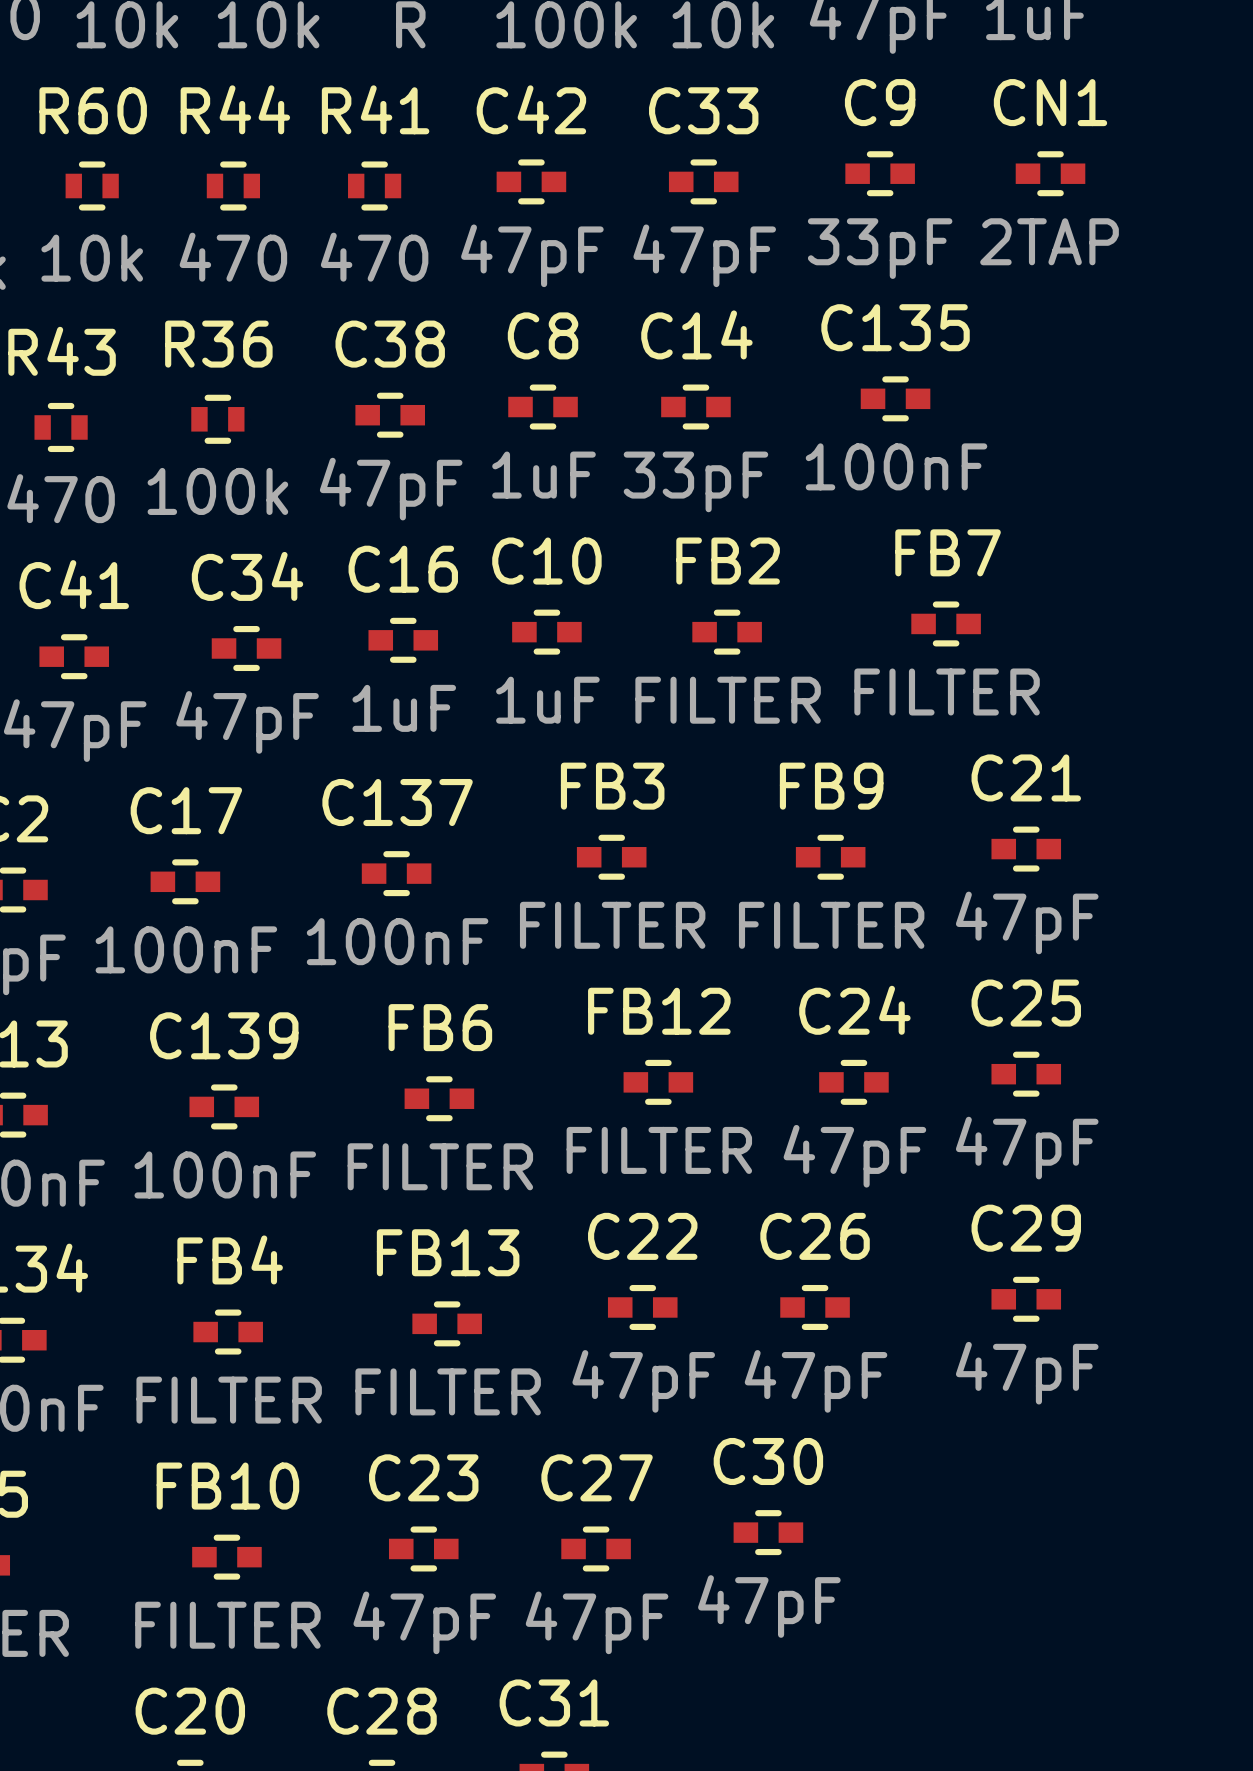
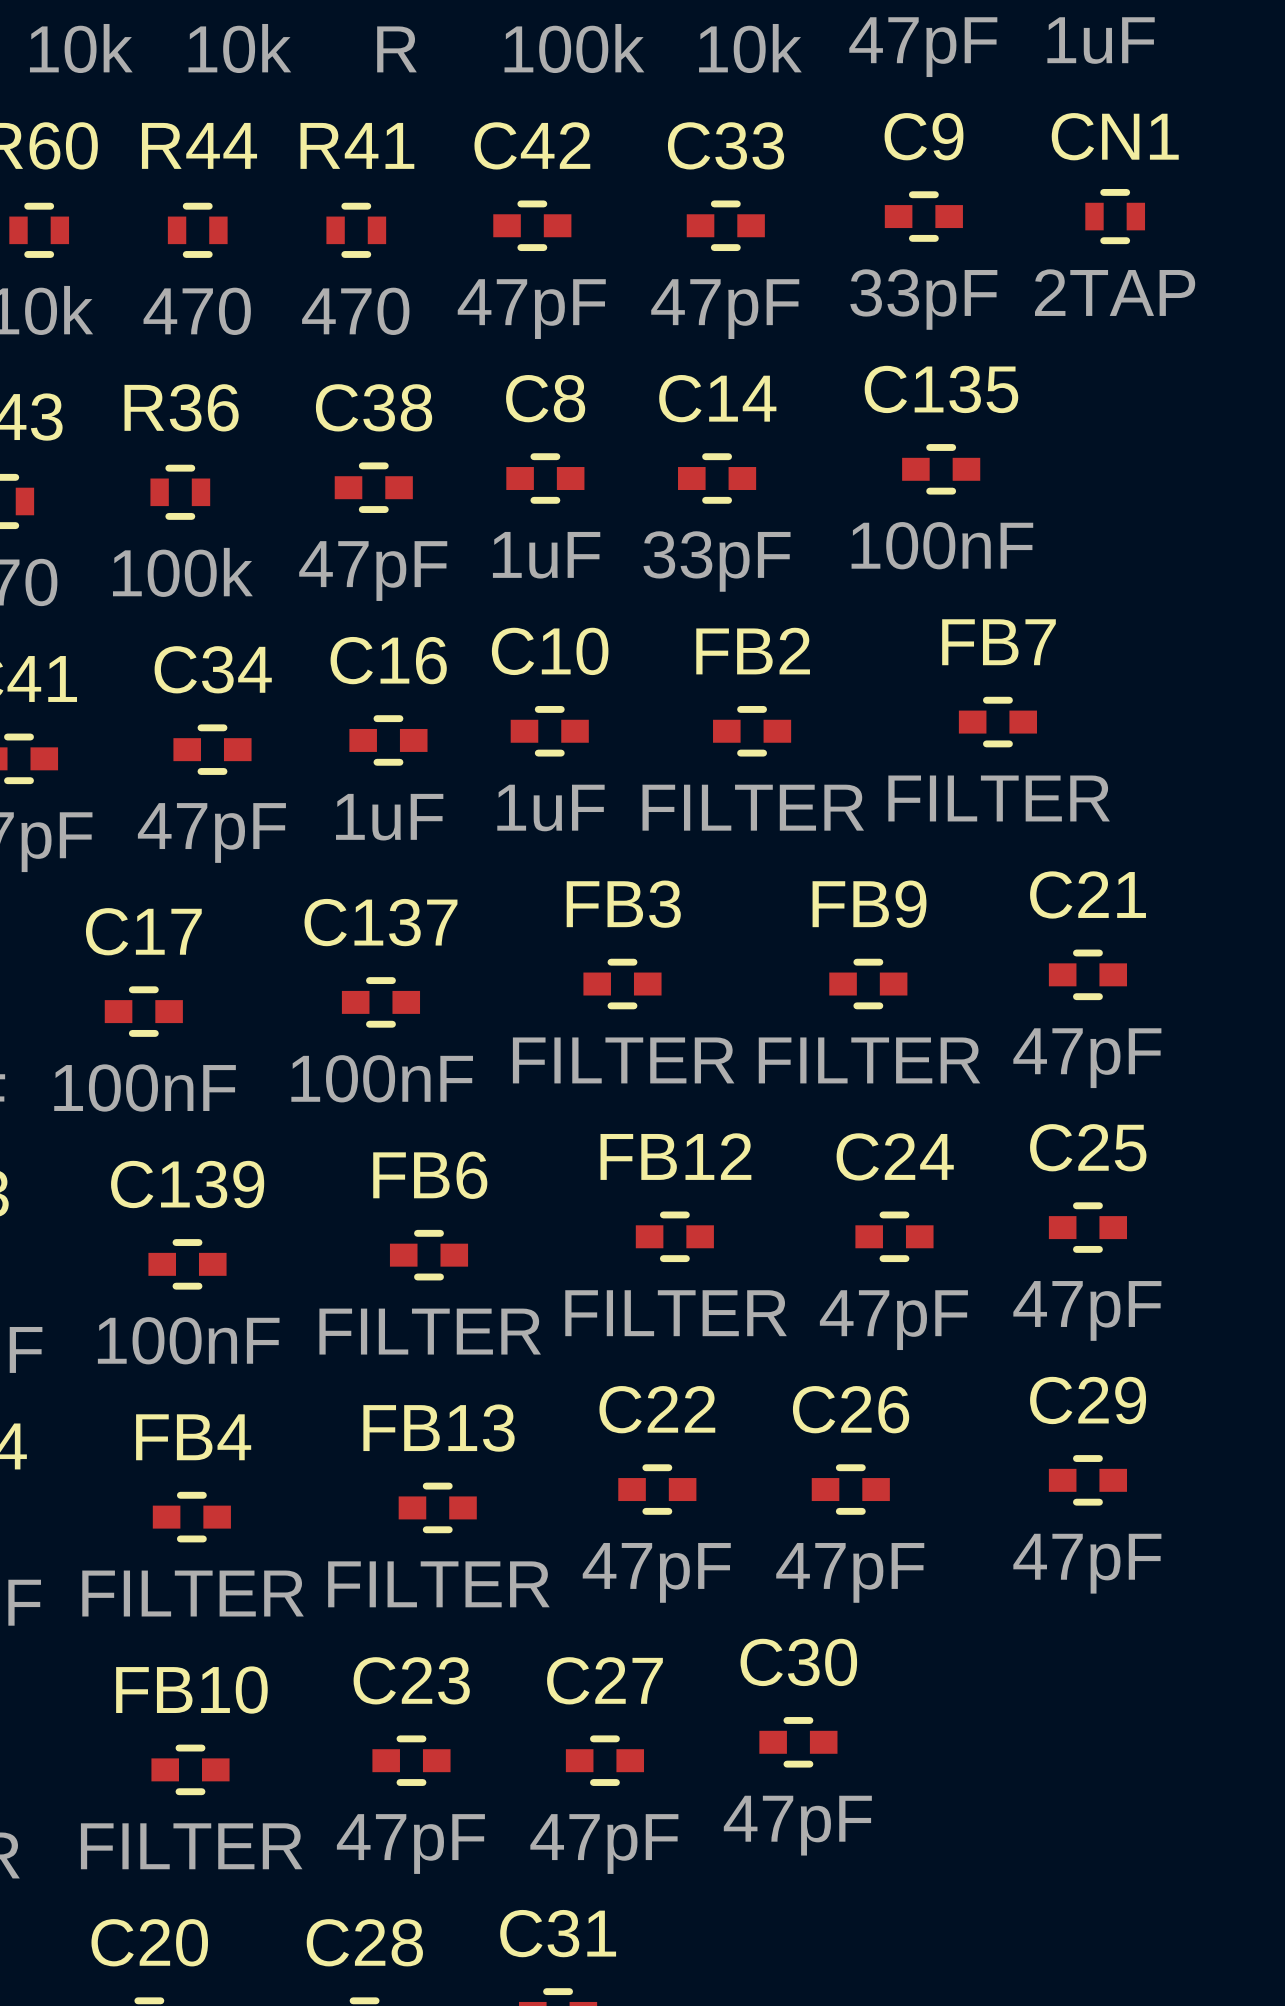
CN1 footprint: [1015, 151, 1086, 197] -> [1085, 188, 1146, 245]

